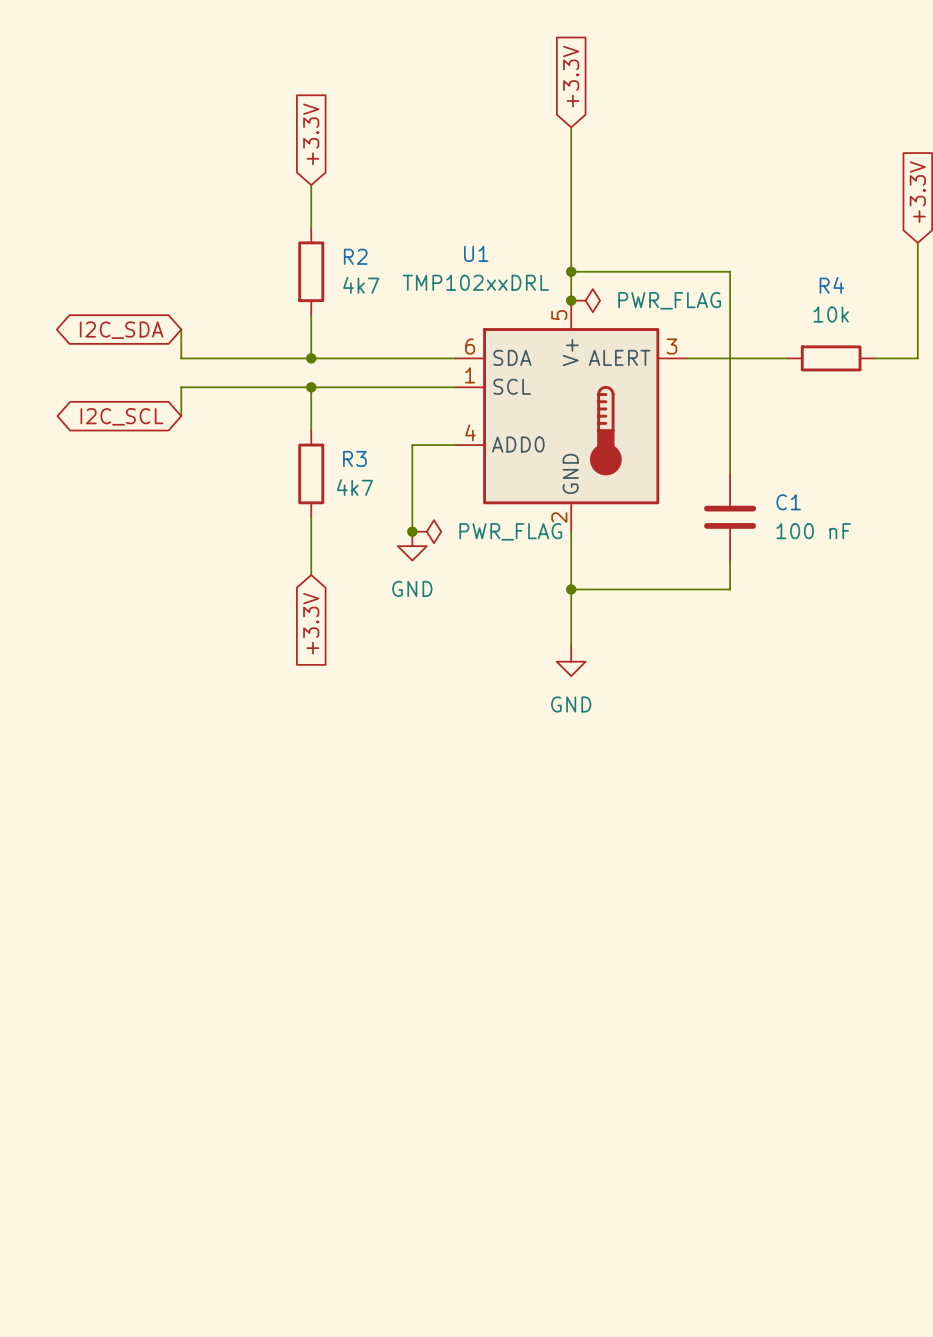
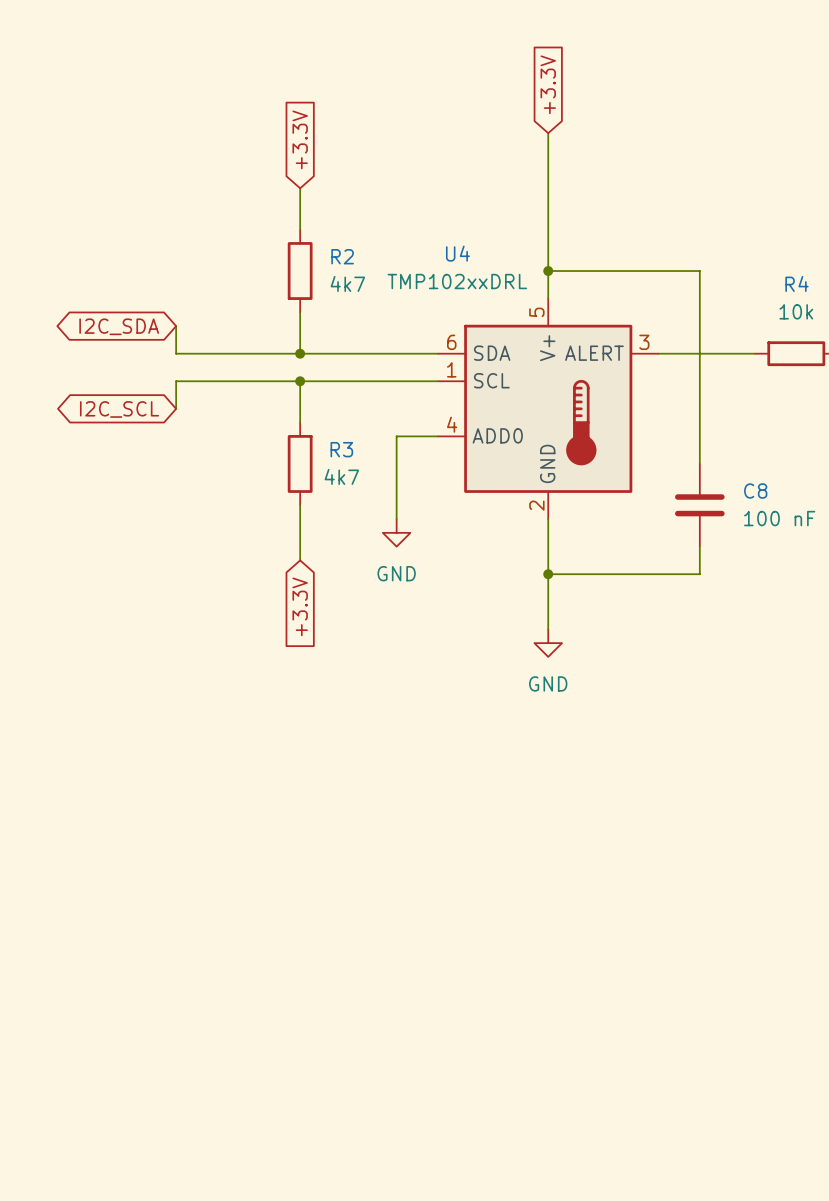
U1 name: U1 (476, 253) -> U4 (457, 253)
junction: (571, 300) -> none
power symbol: PWR_FLAG (585, 300) -> none
C1 name: C1 (788, 502) -> C8 (755, 491)
junction: (412, 531) -> none
power symbol: PWR_FLAG (426, 531) -> none

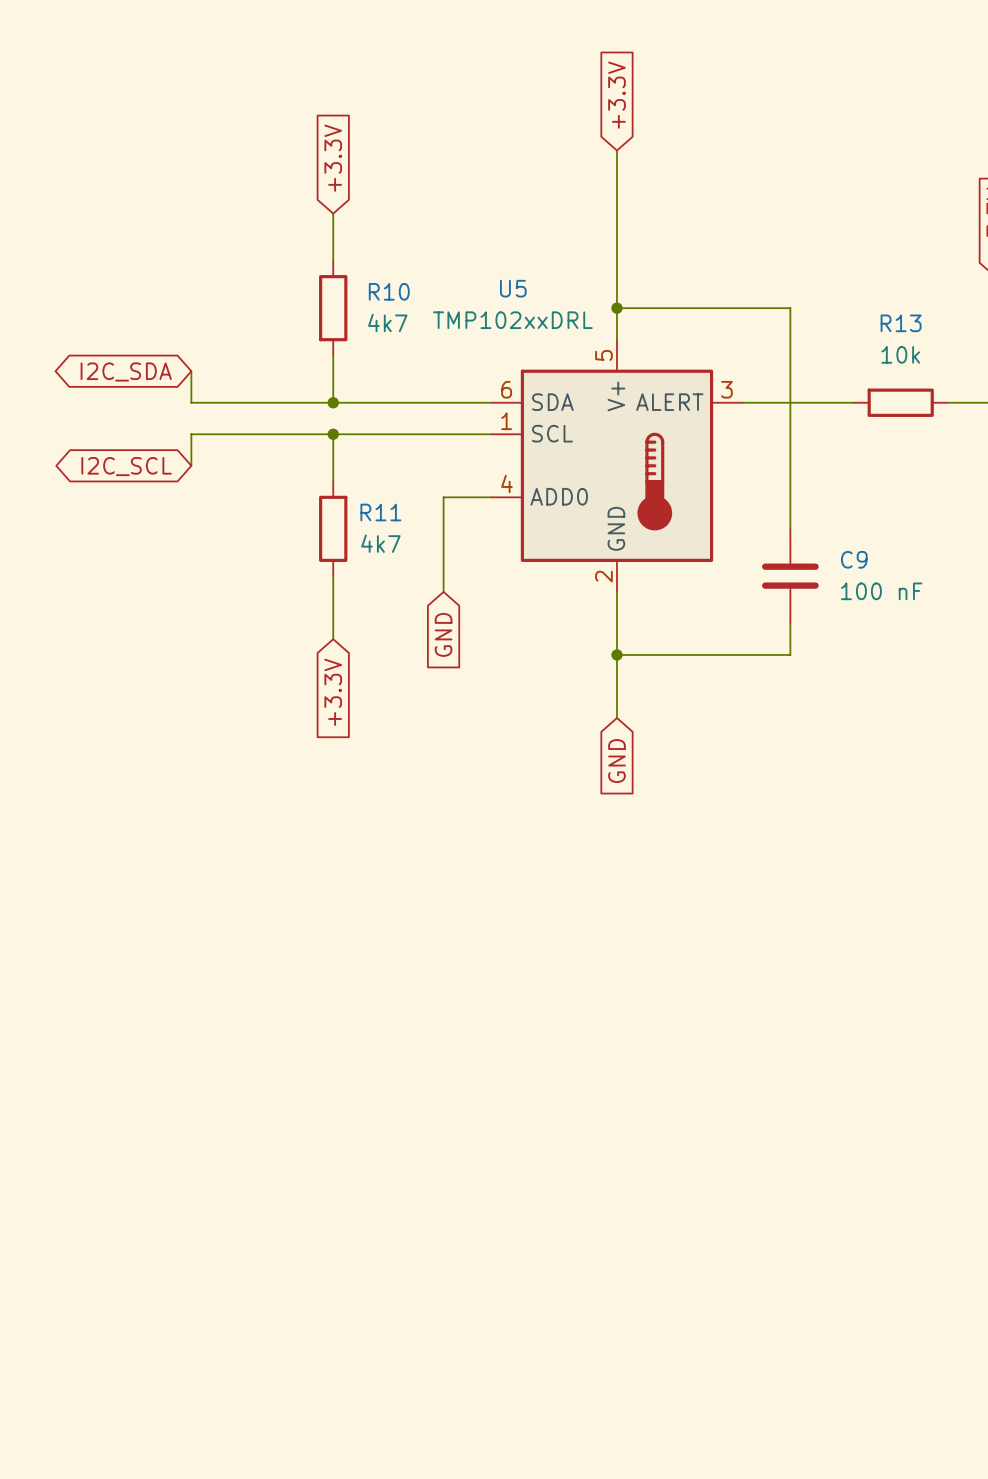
U4 name: U4 (457, 253) -> U5 (513, 288)
R2 name: R2 (342, 256) -> R10 (389, 291)
R4 name: R4 (796, 283) -> R13 (901, 323)
R3 name: R3 (341, 449) -> R11 (380, 512)
C8 name: C8 (755, 491) -> C9 (854, 559)
power symbol: GND (396, 532) -> none
global label: none -> GND (443, 634)
power symbol: GND (548, 643) -> none
global label: none -> GND (616, 761)

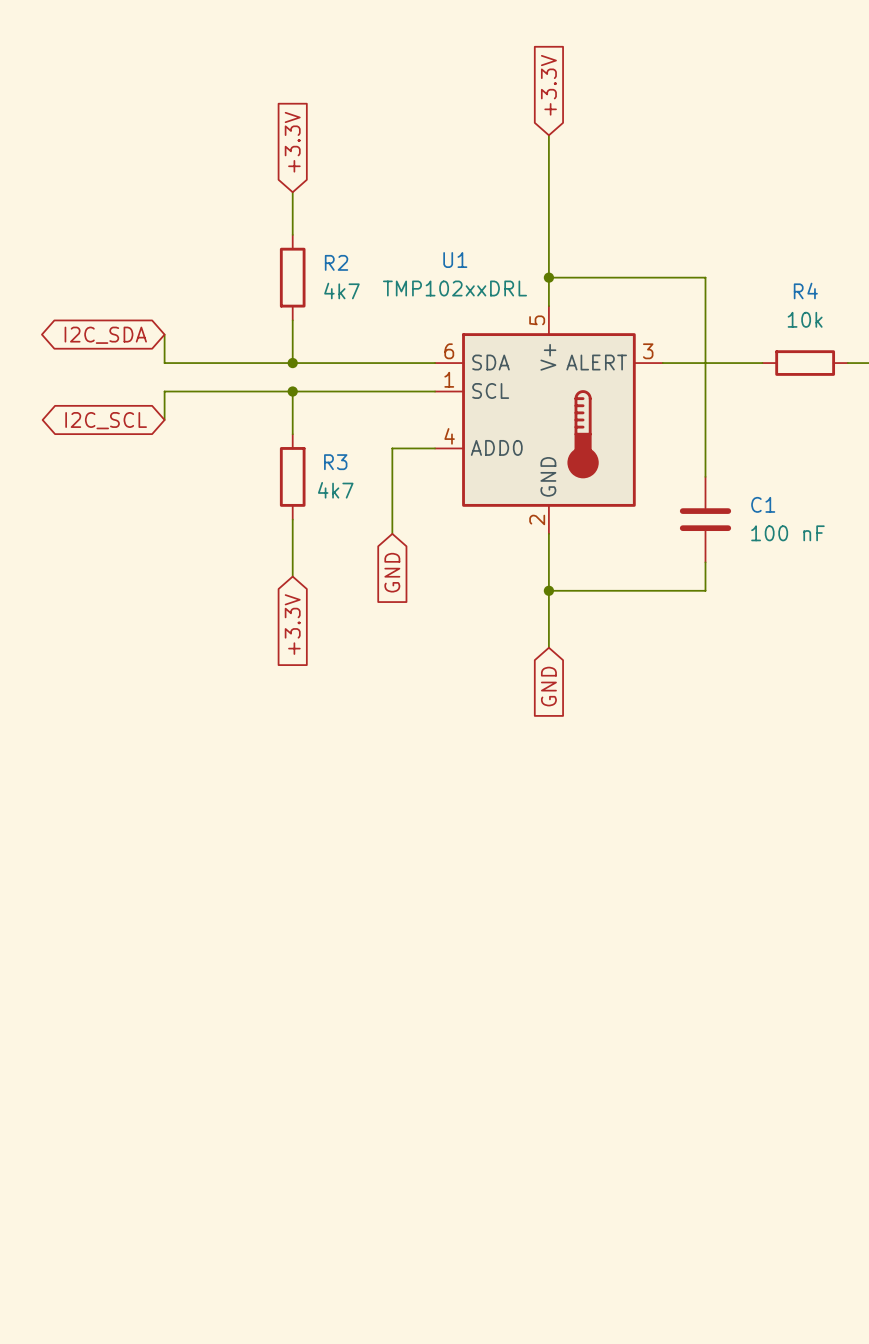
U5 name: U5 (513, 288) -> U1 (455, 260)
R10 name: R10 (389, 291) -> R2 (336, 262)
R13 name: R13 (901, 323) -> R4 (805, 291)
R11 name: R11 (380, 512) -> R3 (335, 462)
C9 name: C9 (854, 559) -> C1 (763, 504)

